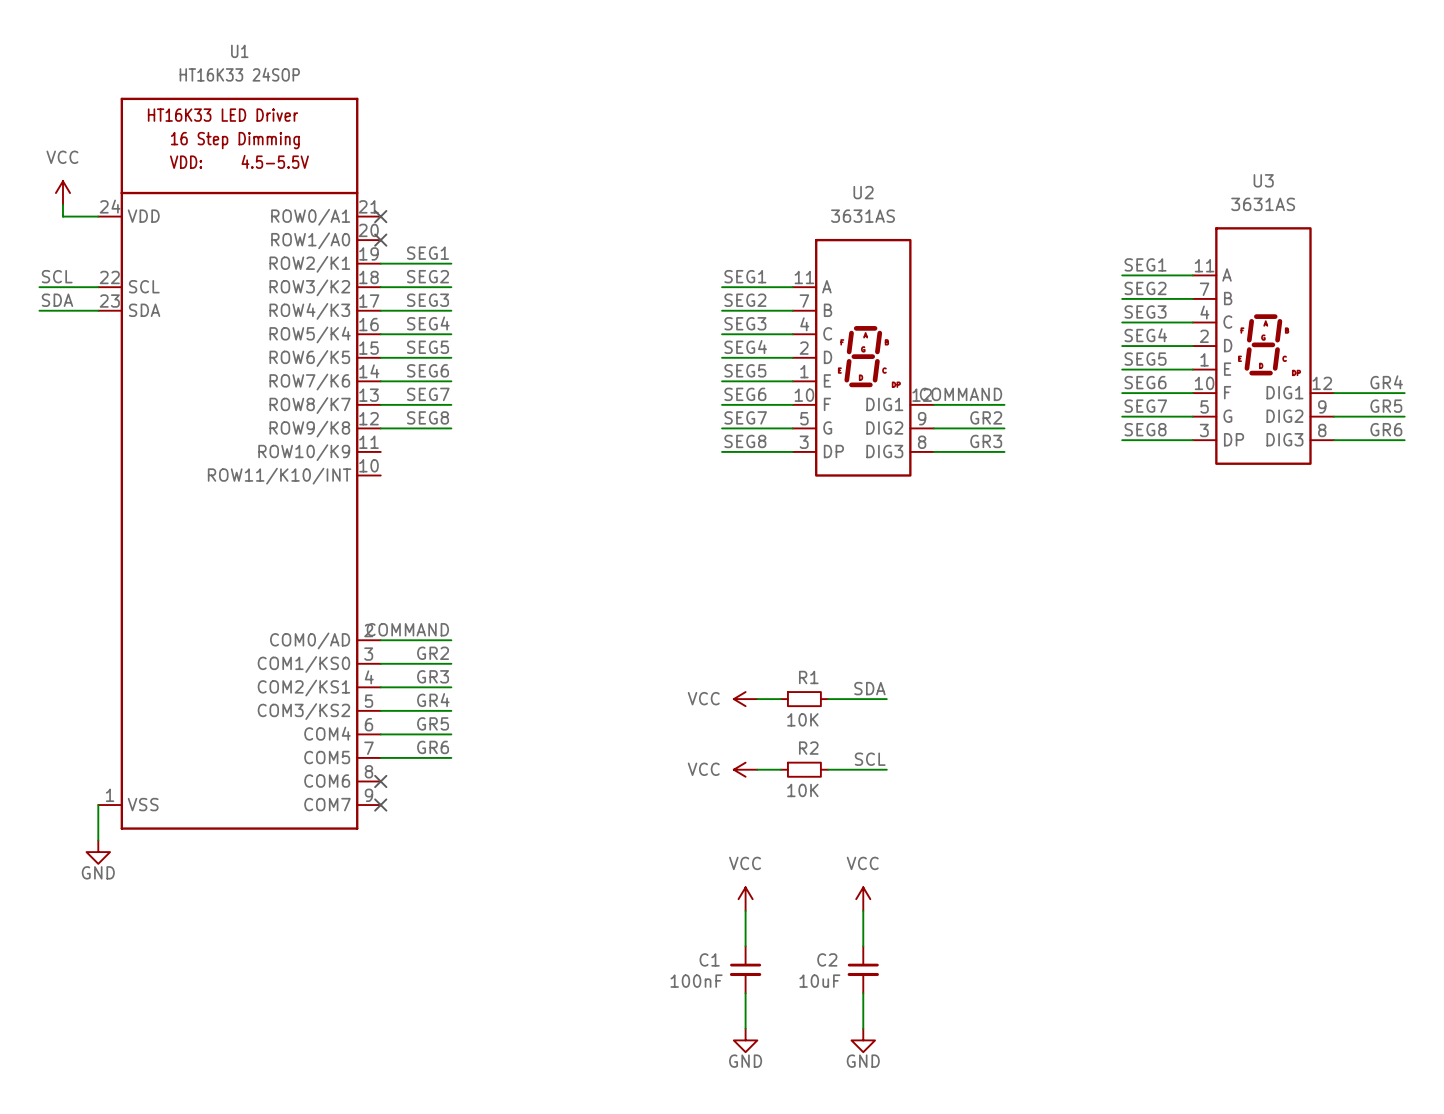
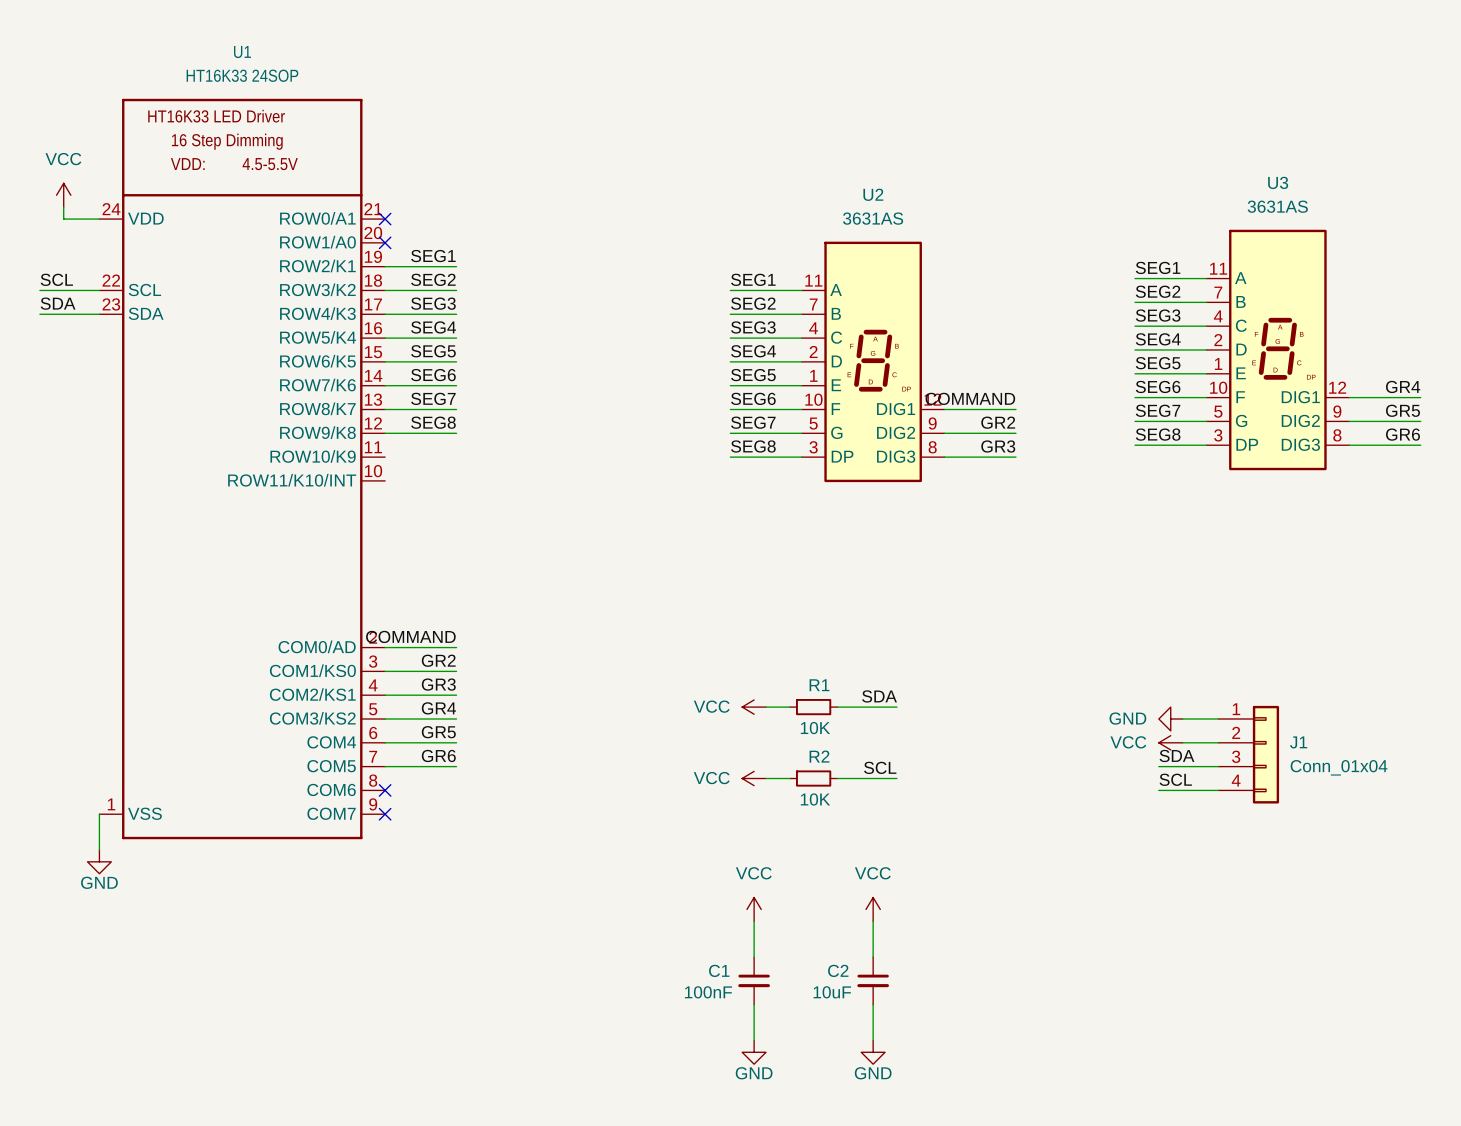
power symbol: none -> GND (1170, 719)
wire: none -> (1182, 719) (1218, 719)
power symbol: none -> VCC (1170, 742)
wire: none -> (1182, 742) (1218, 742)
J1: none -> Conn_01x04 (1248, 754)
label: none -> SDA (1176, 755)
wire: none -> (1158, 766) (1218, 766)
label: none -> SCL (1175, 779)
wire: none -> (1158, 790) (1218, 790)

